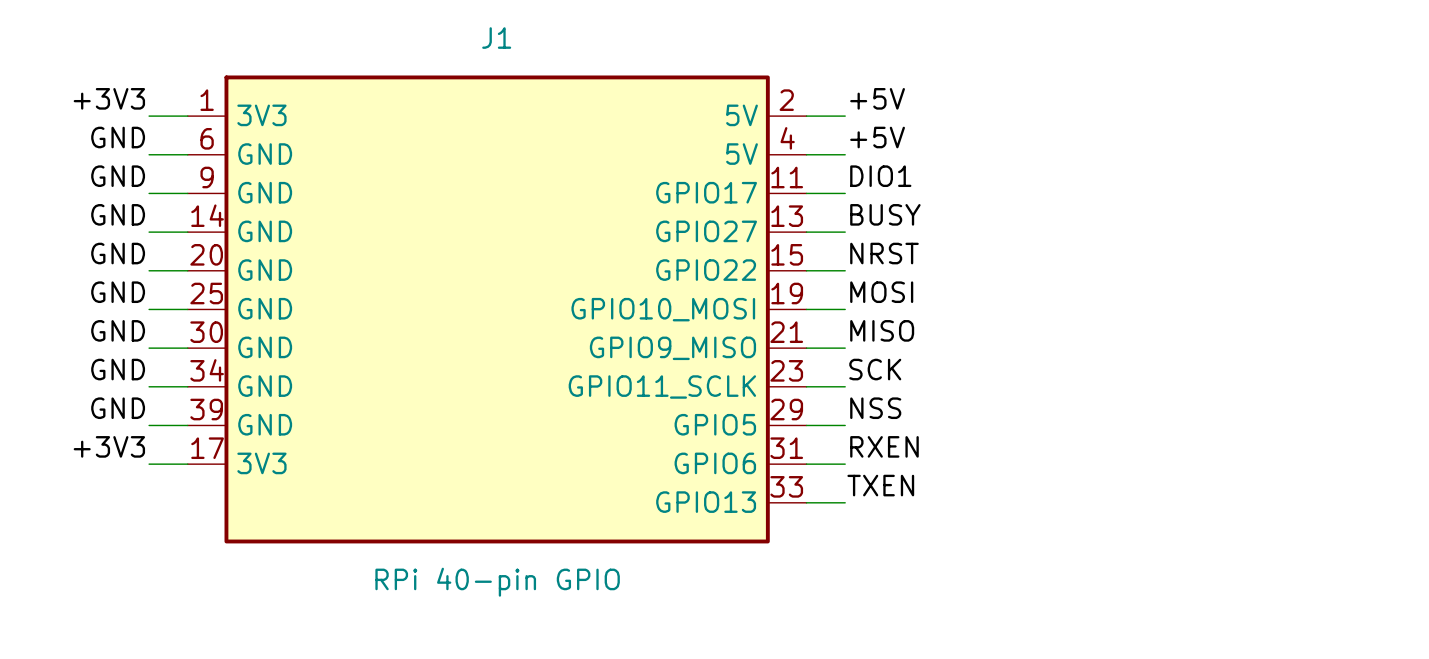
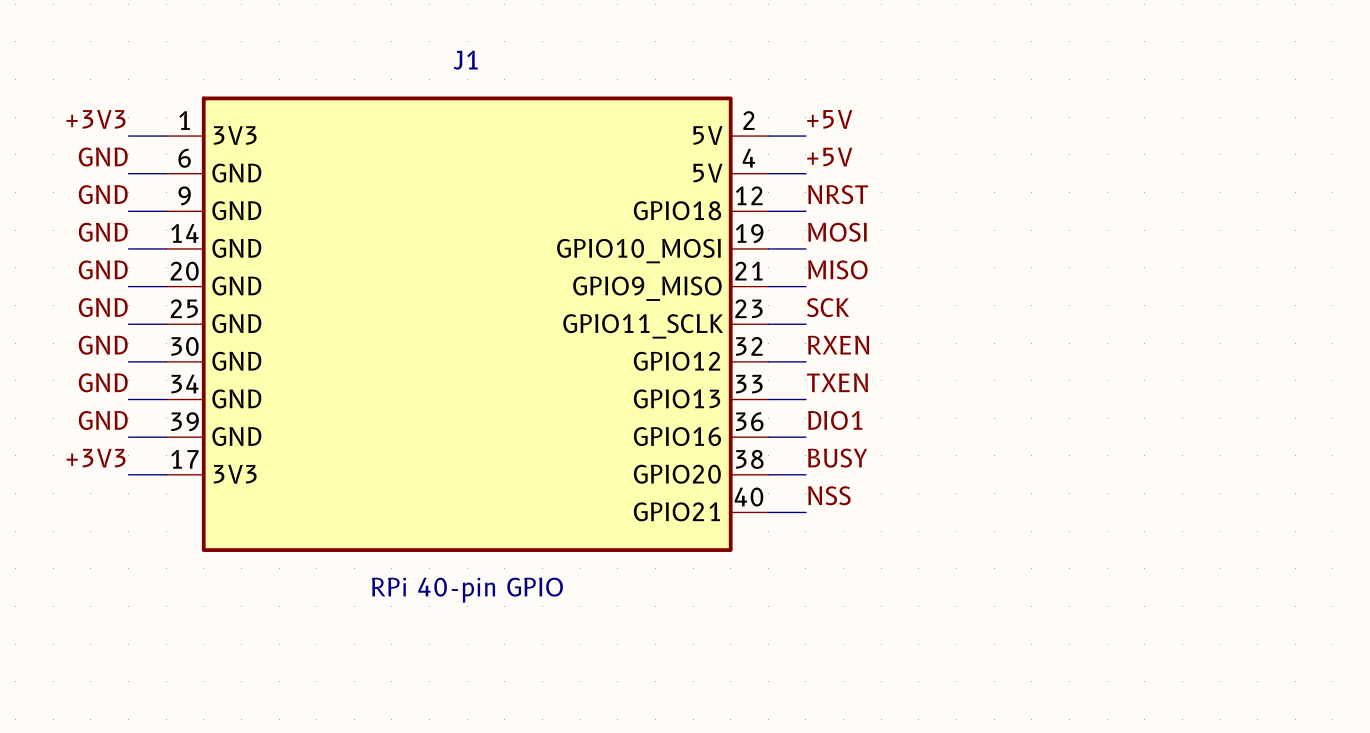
J1 symbol: [187, 75, 807, 544] -> [166, 96, 769, 552]
label: DIO1 (880, 176) -> NRST (838, 194)
label: BUSY (885, 214) -> MOSI (837, 232)
label: NRST (884, 253) -> MISO (837, 269)
label: MOSI (881, 292) -> SCK (828, 307)
label: MISO (882, 330) -> RXEN (838, 345)
label: SCK (875, 369) -> TXEN (837, 382)
label: NSS (875, 408) -> DIO1 (835, 420)
label: RXEN (884, 446) -> BUSY (837, 458)
label: TXEN (880, 485) -> NSS (829, 495)

